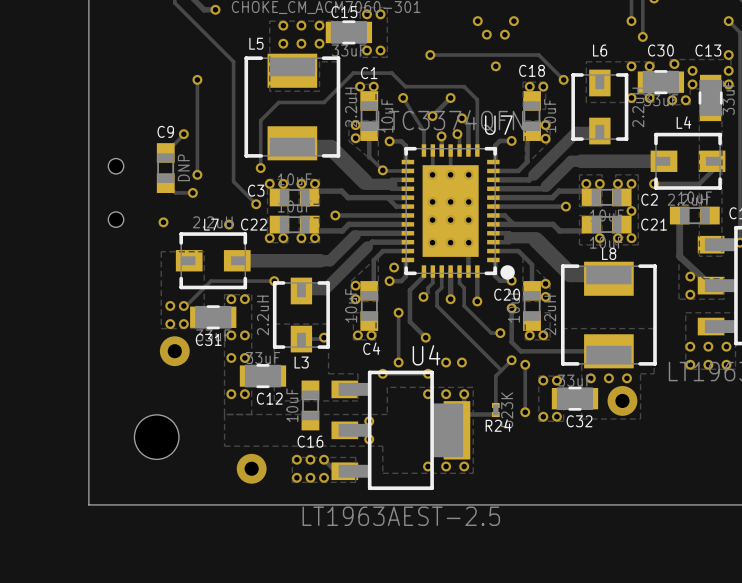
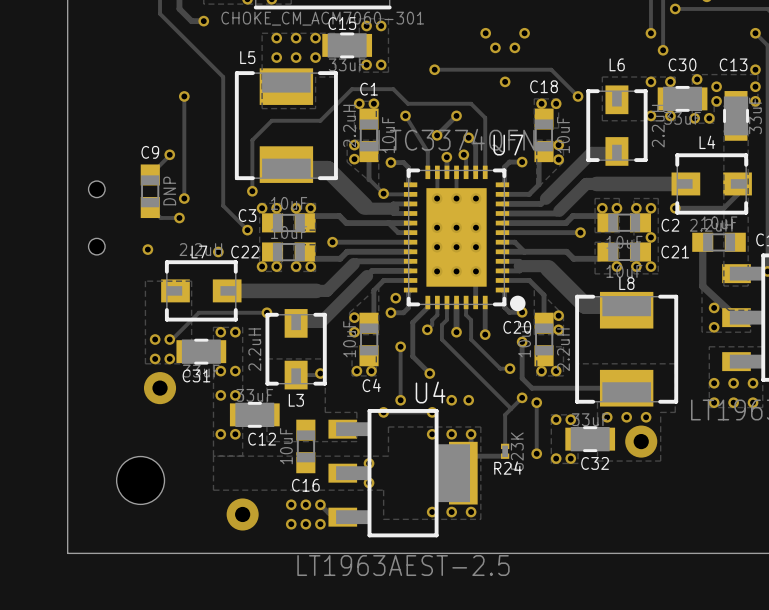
zone outline: (355, 457) (292, 457) (292, 482) (355, 482) (355, 457) -> none

